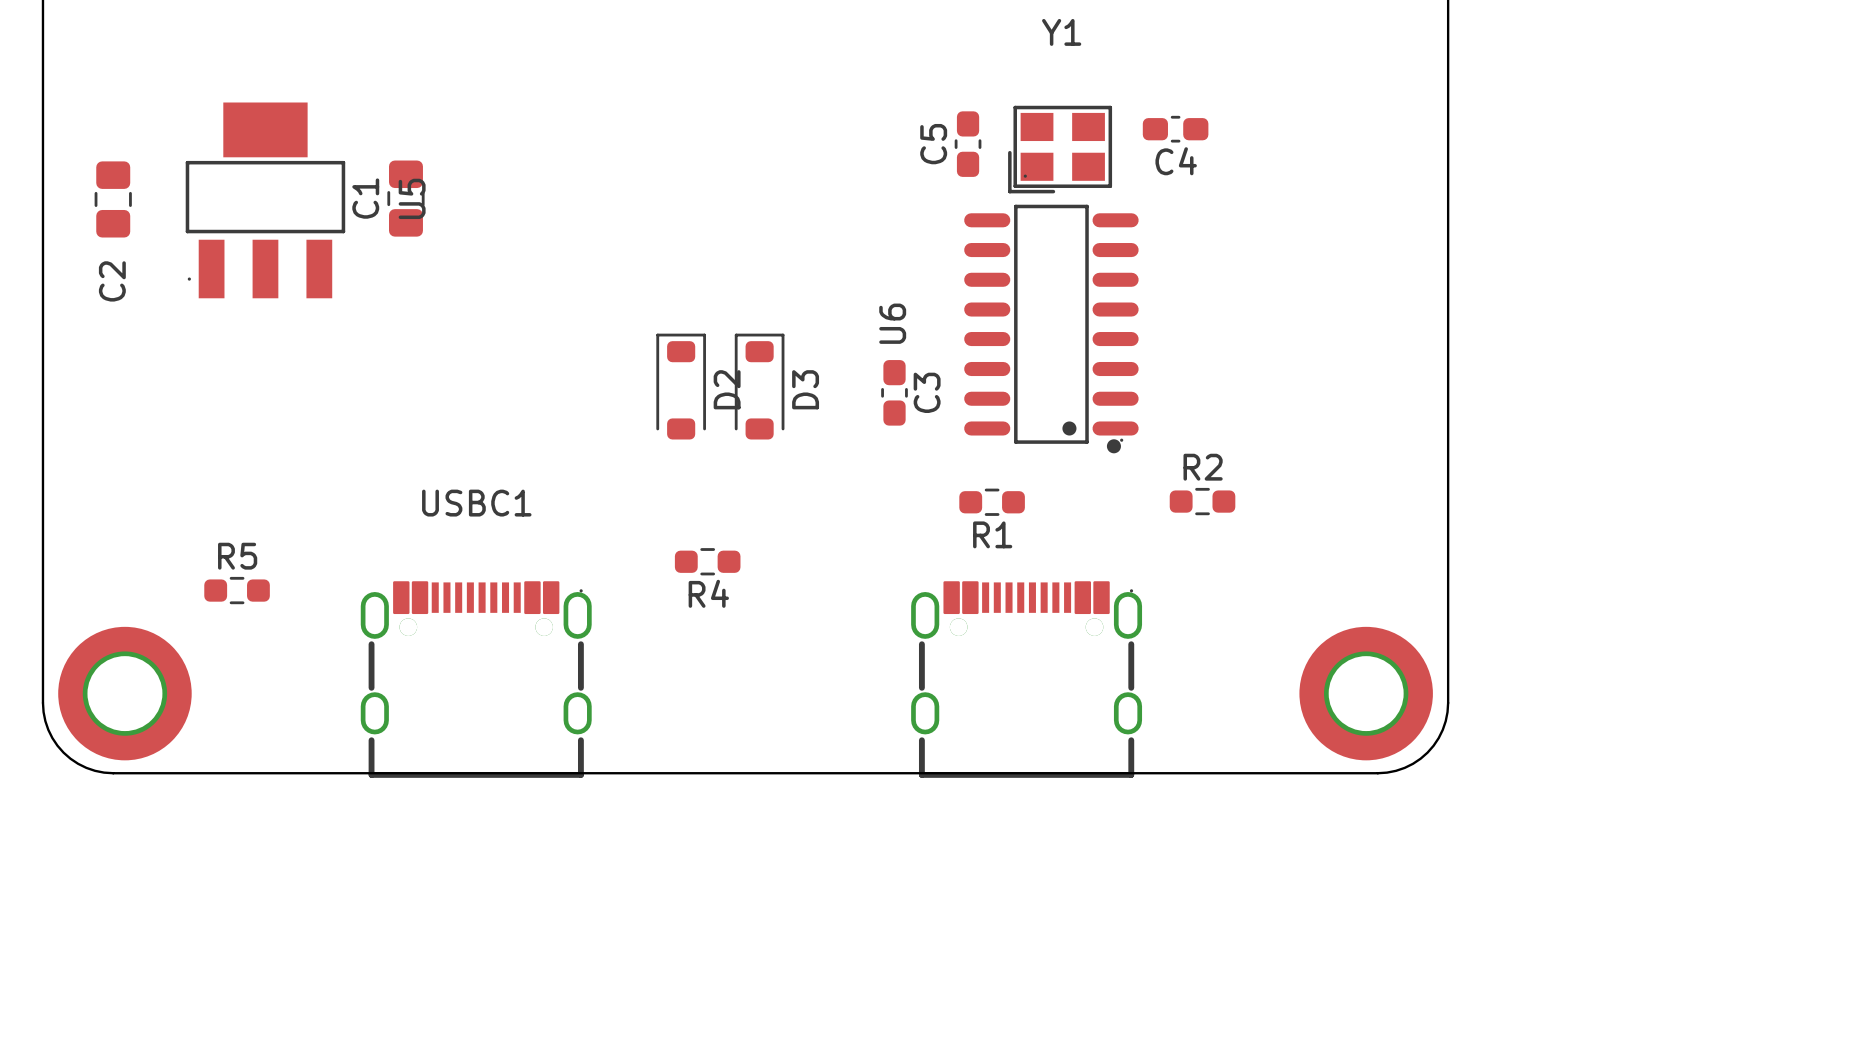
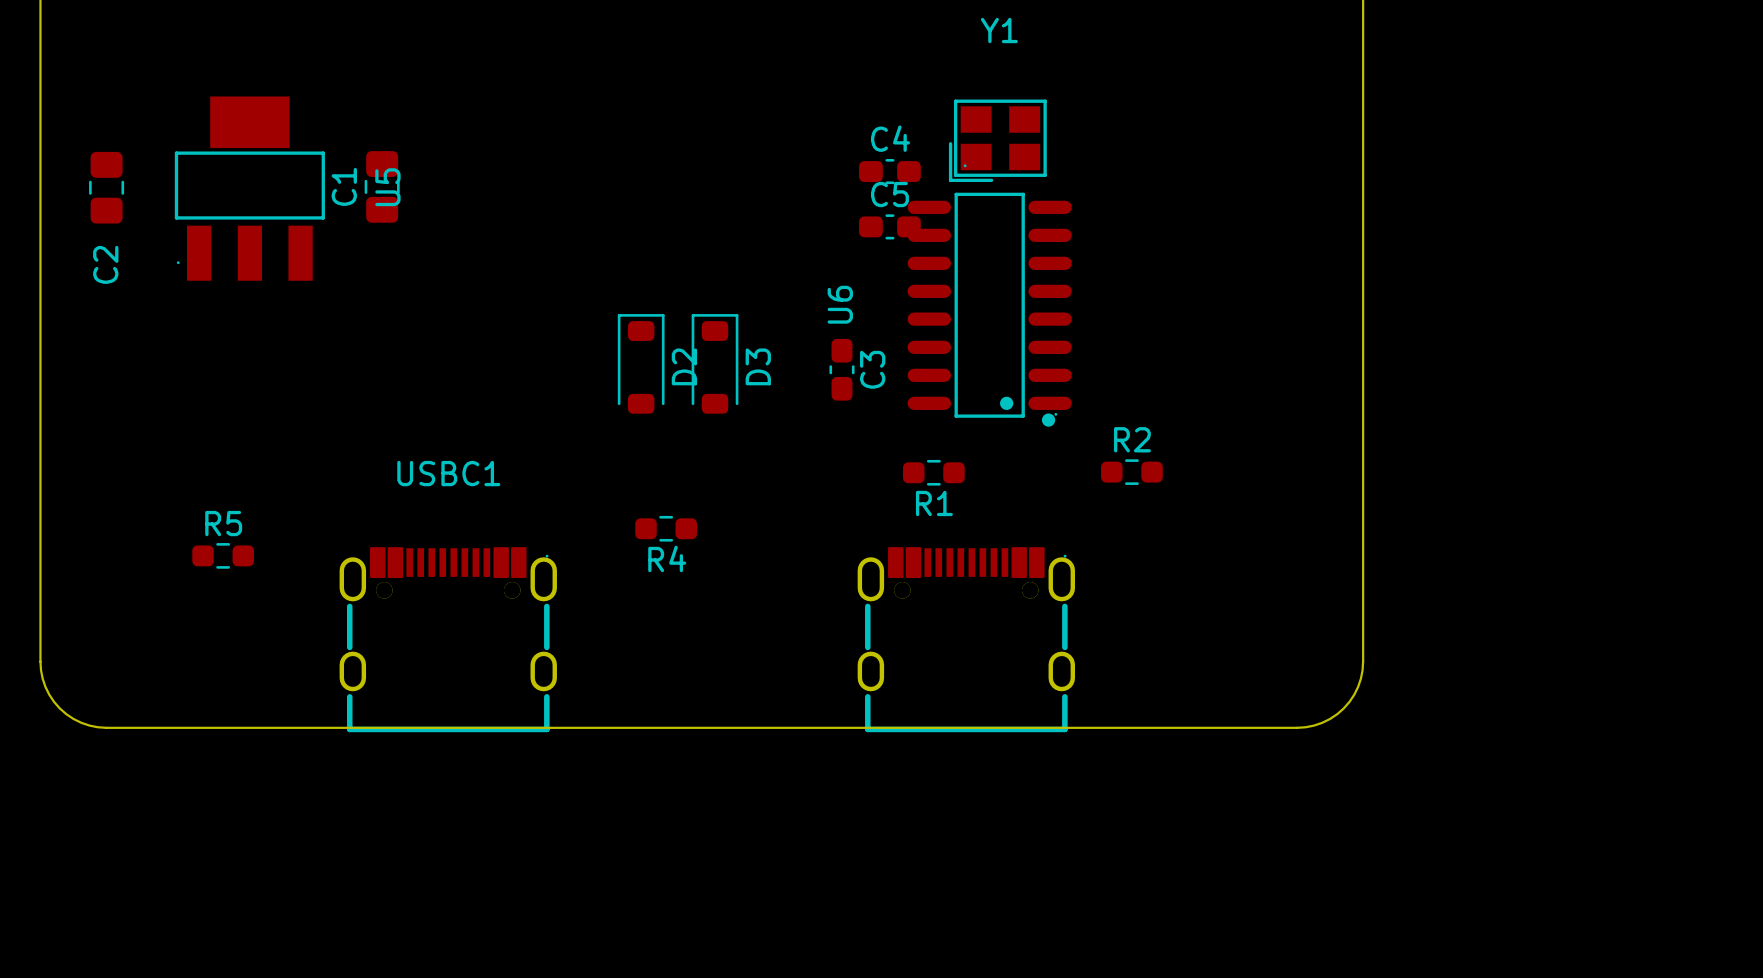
C4 position: (1175, 129) -> (889, 171)
C5 rotation: 0° (968, 144) -> 90° clockwise (889, 226)
C5 position: (968, 144) -> (889, 226)
C4 name position: C4 (1176, 161) -> C4 (890, 138)
part: (124, 693) -> none
part: (1366, 693) -> none

